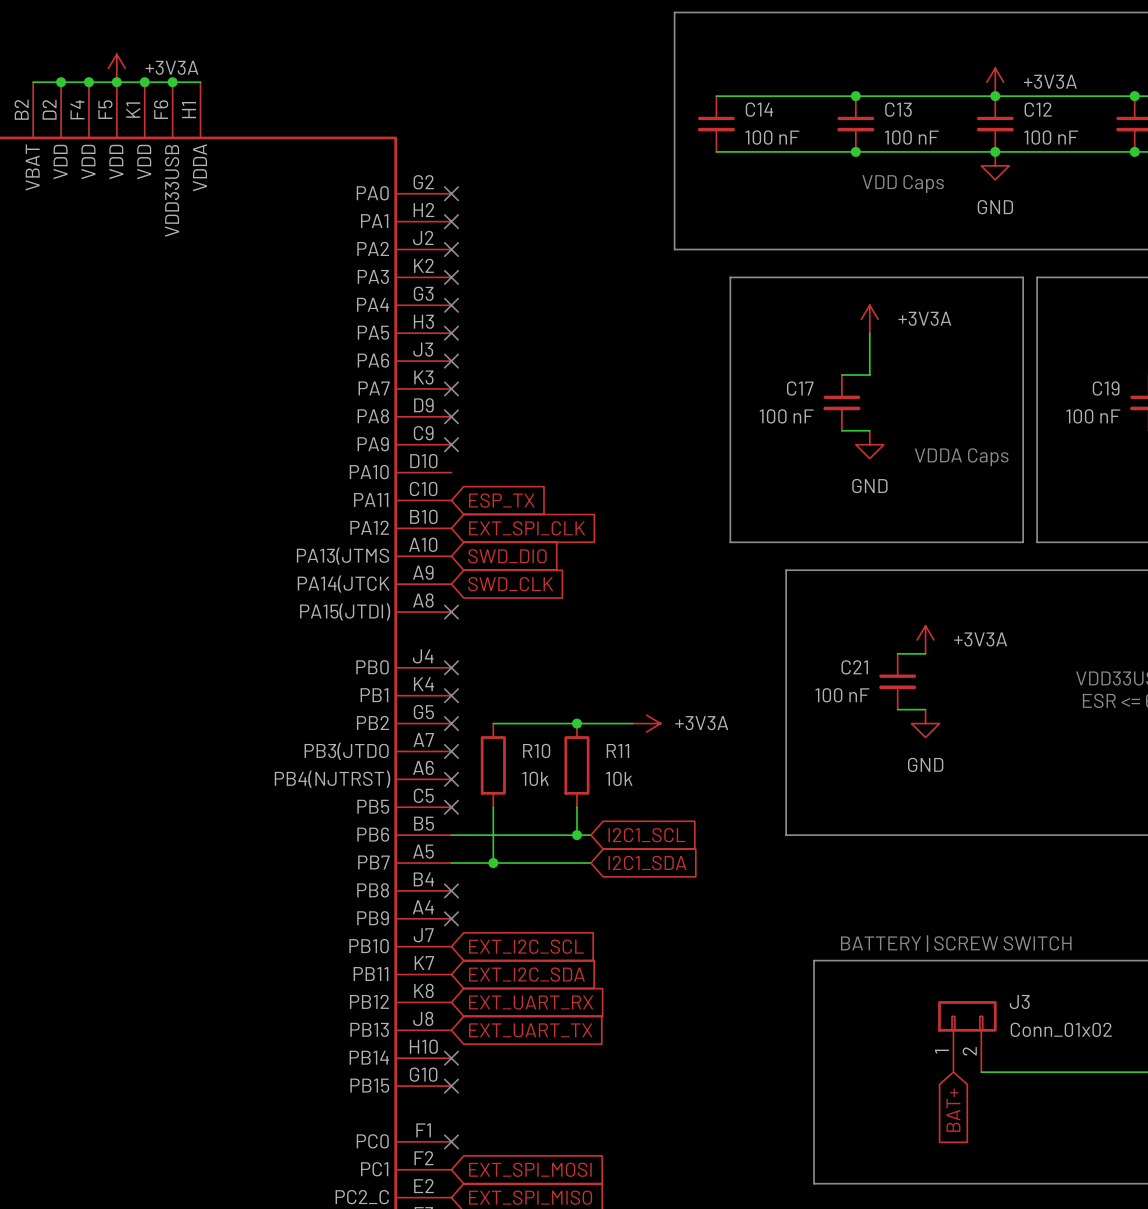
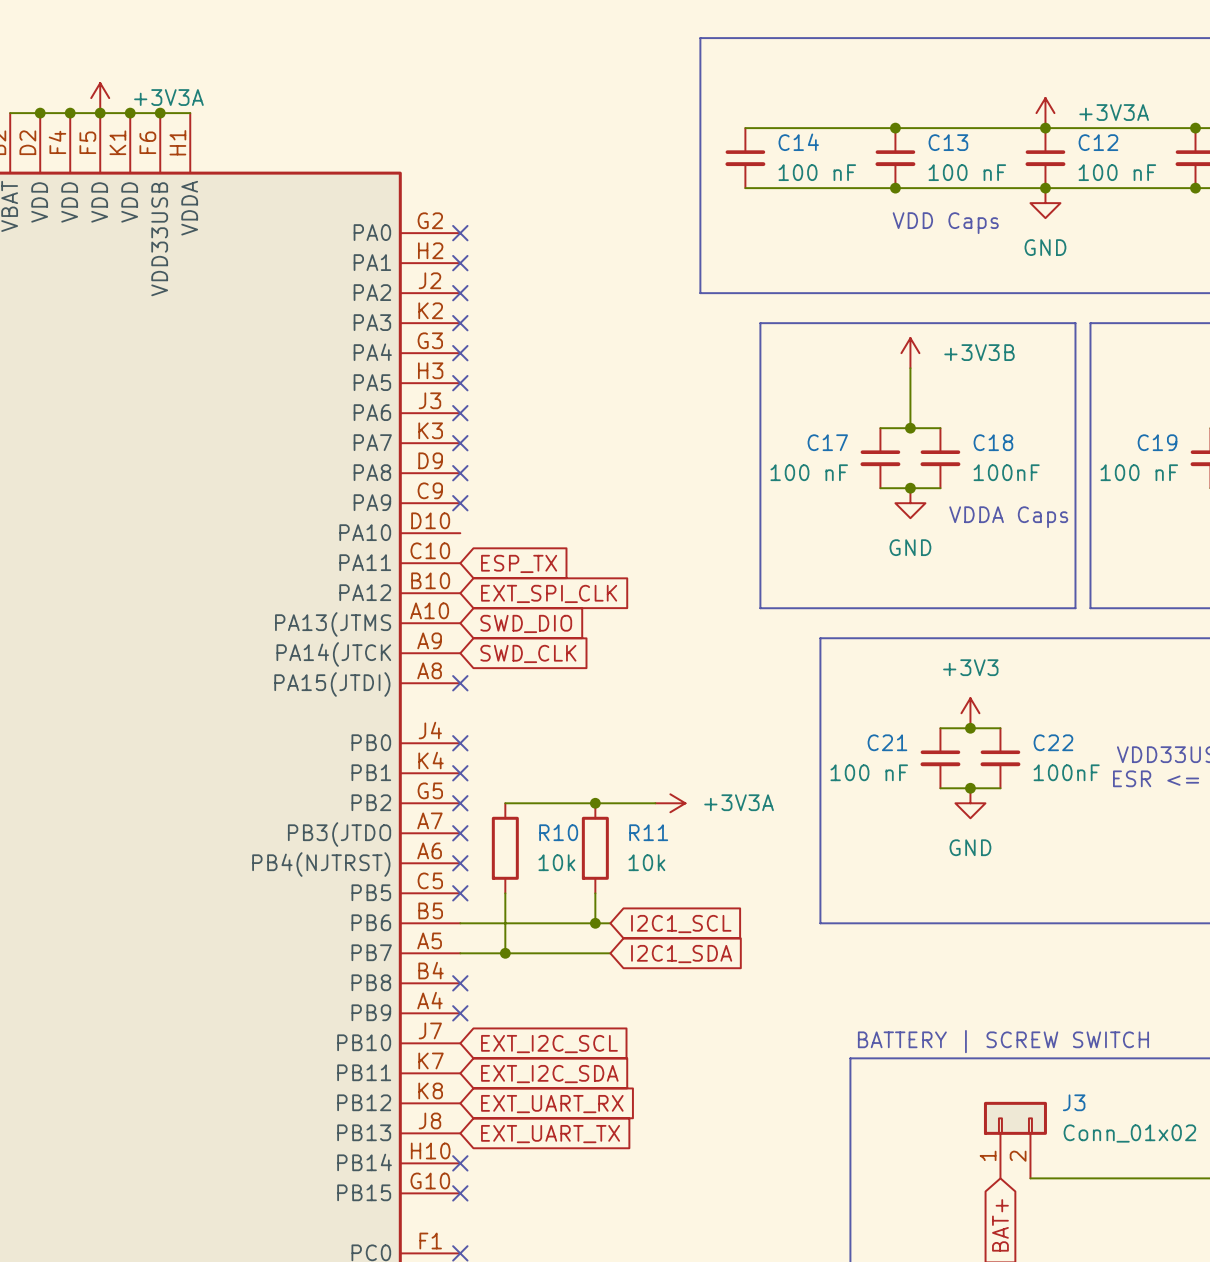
power symbol: none -> +3V3B (910, 353)
power symbol: +3V3A (869, 319) -> none
wire: none -> (910, 428) (940, 428)
junction: none -> (910, 428)
C18: none -> 100nF (940, 458)
wire: none -> (910, 488) (940, 488)
junction: none -> (910, 488)
power symbol: +3V3A (925, 639) -> +3V3 (970, 713)
wire: none -> (970, 728) (1000, 728)
junction: none -> (970, 728)
C22: none -> 100nF (1000, 758)
wire: none -> (970, 788) (1000, 788)
junction: none -> (970, 788)

